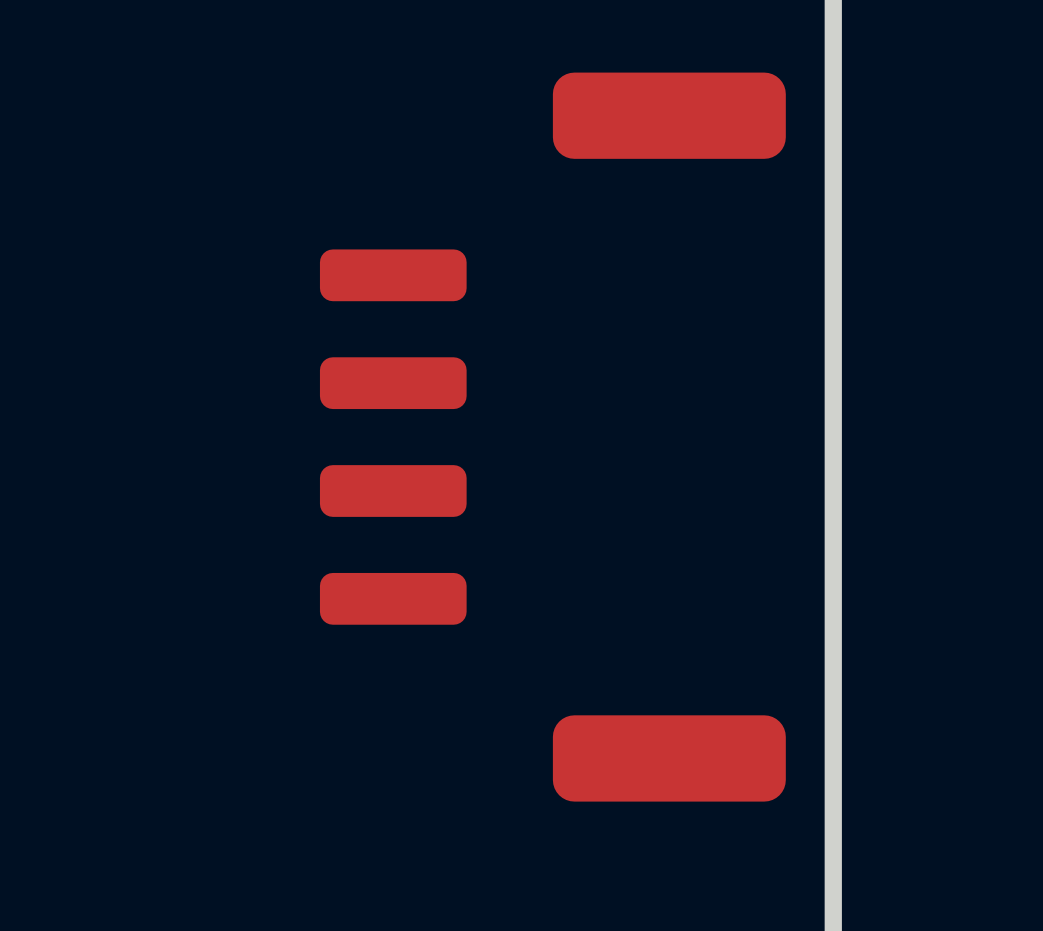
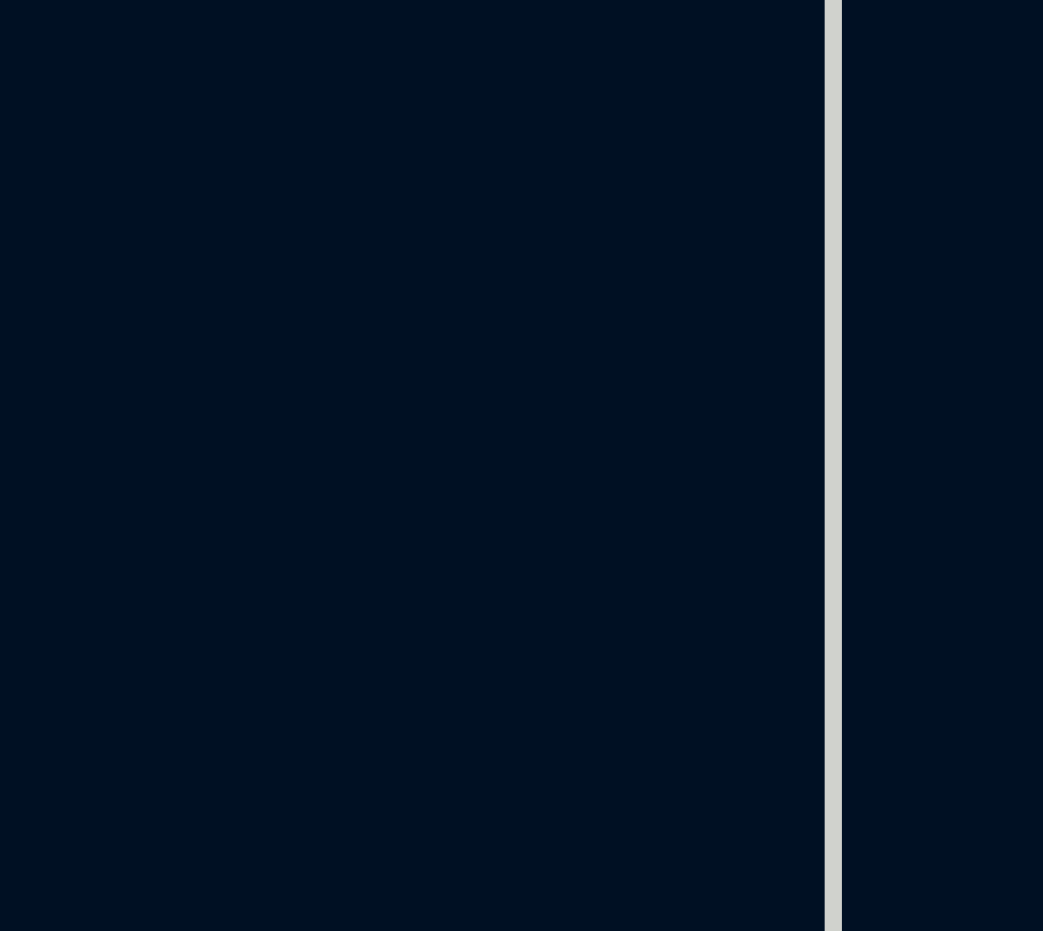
part: (552, 437) -> none

